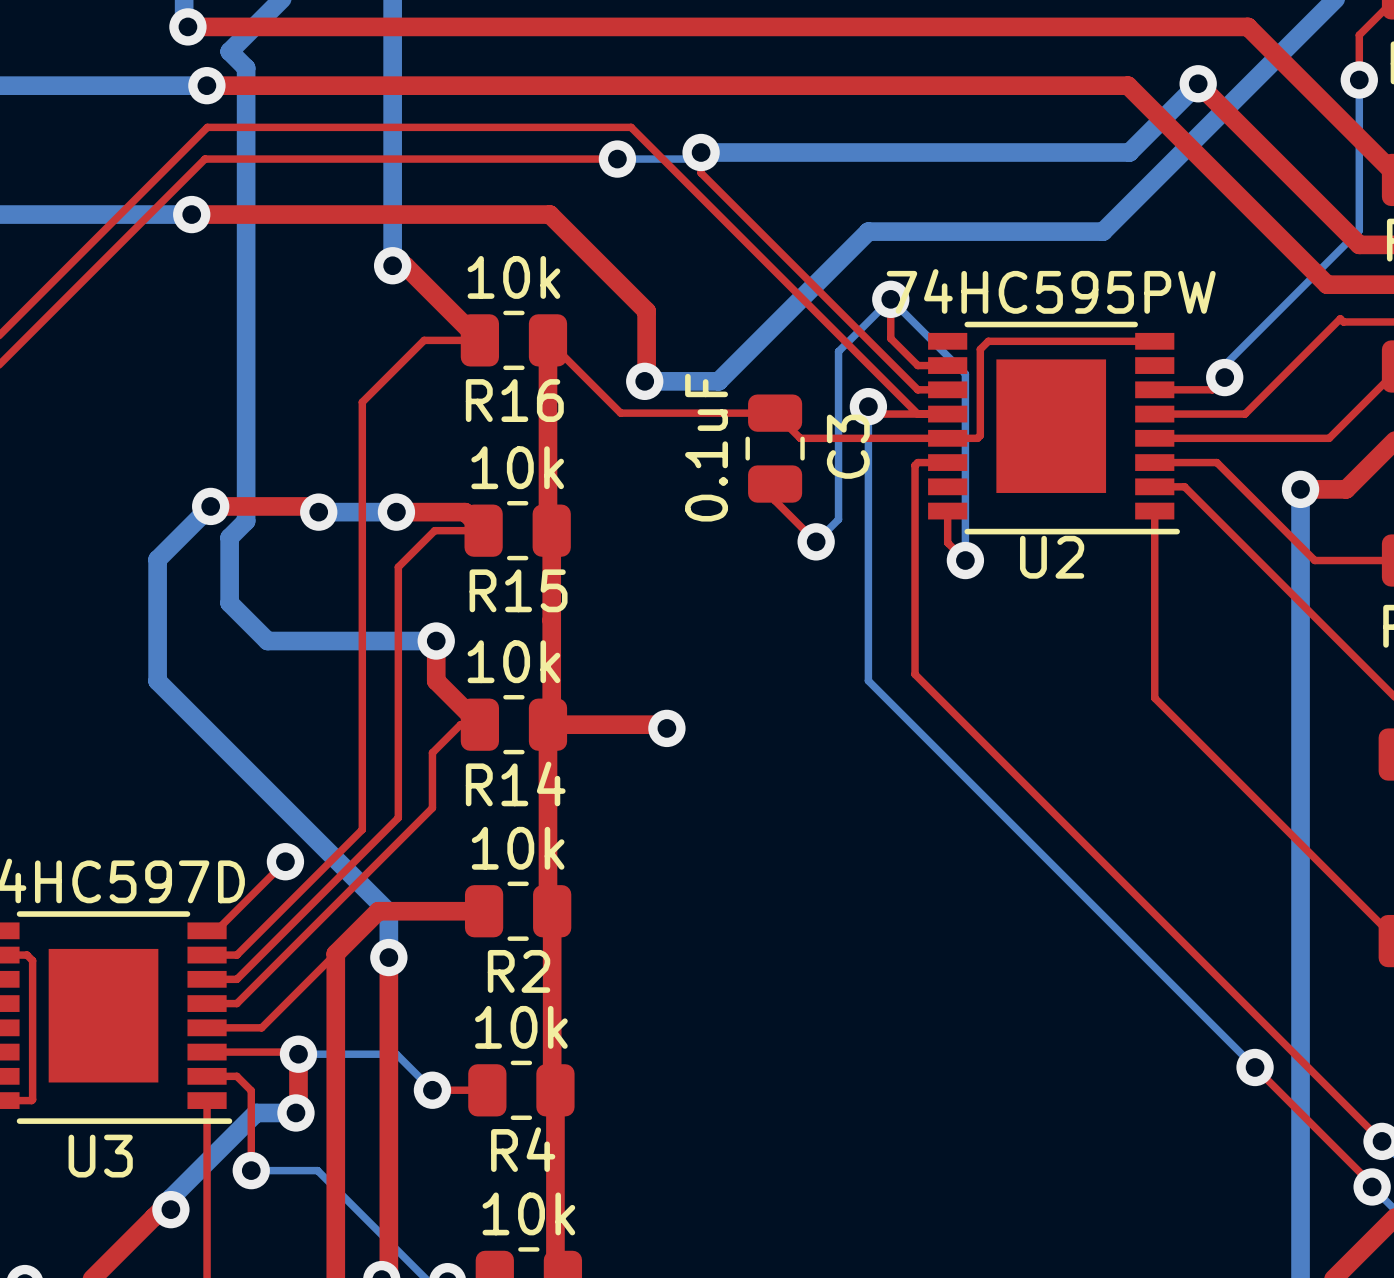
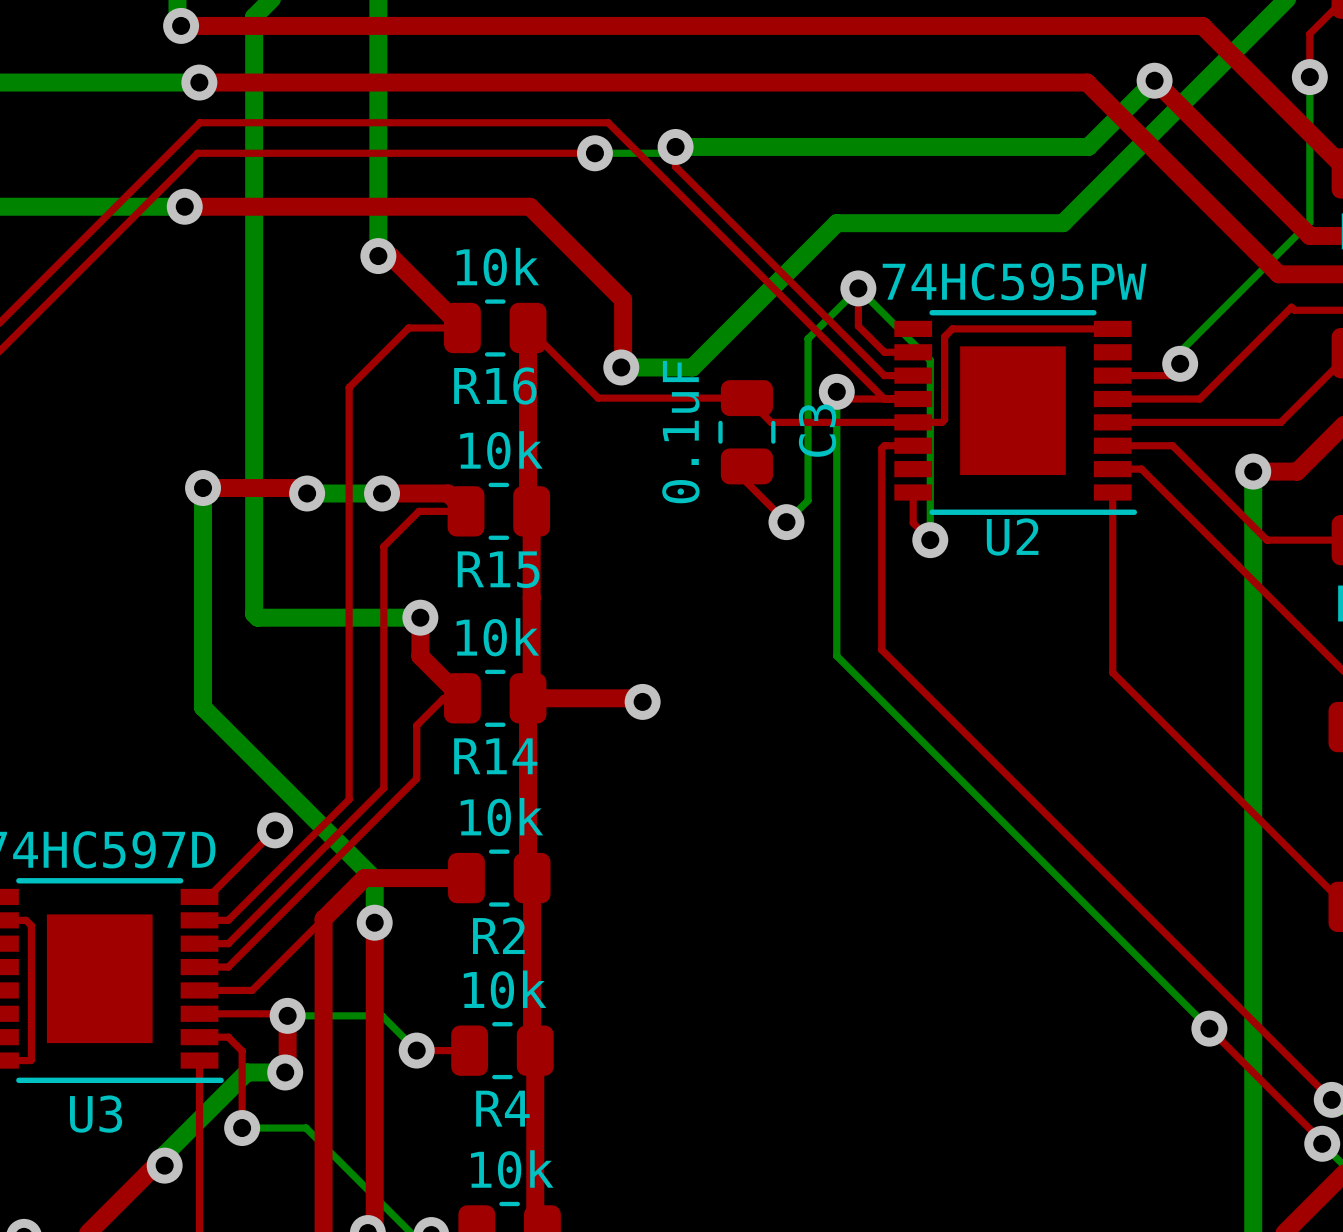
bottom track: (263, 17) (229, 51) (246, 68) (246, 521) (229, 537) (229, 603) (263, 637) -> (254, 16) (254, 614)
bottom track: (210, 506) (157, 559) (157, 681) (210, 734) -> (203, 488) (203, 707)

